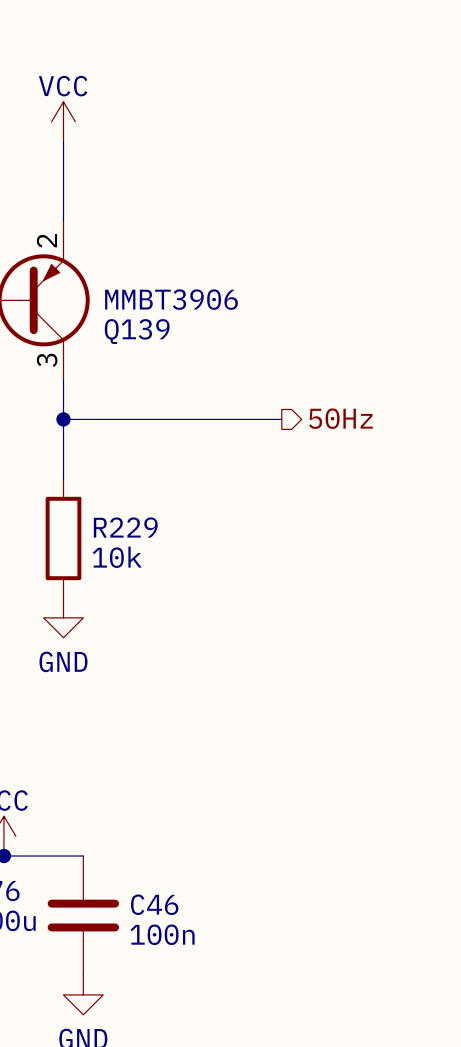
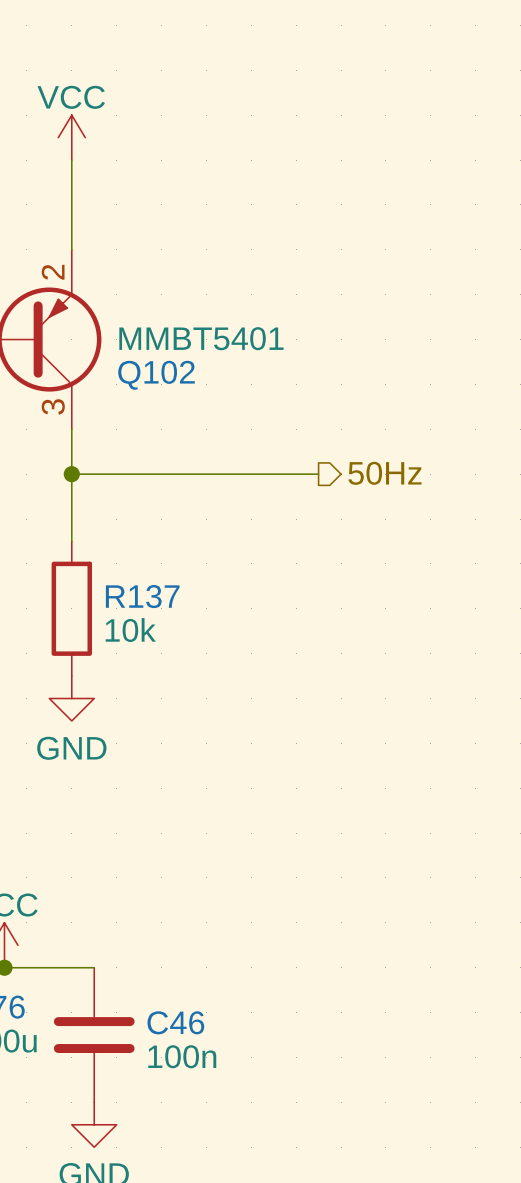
Q139 value: MMBT3906 (171, 299) -> MMBT5401 (201, 338)
Q139 name: Q139 (137, 331) -> Q102 (156, 375)
R229 name: R229 (125, 527) -> R137 (142, 596)

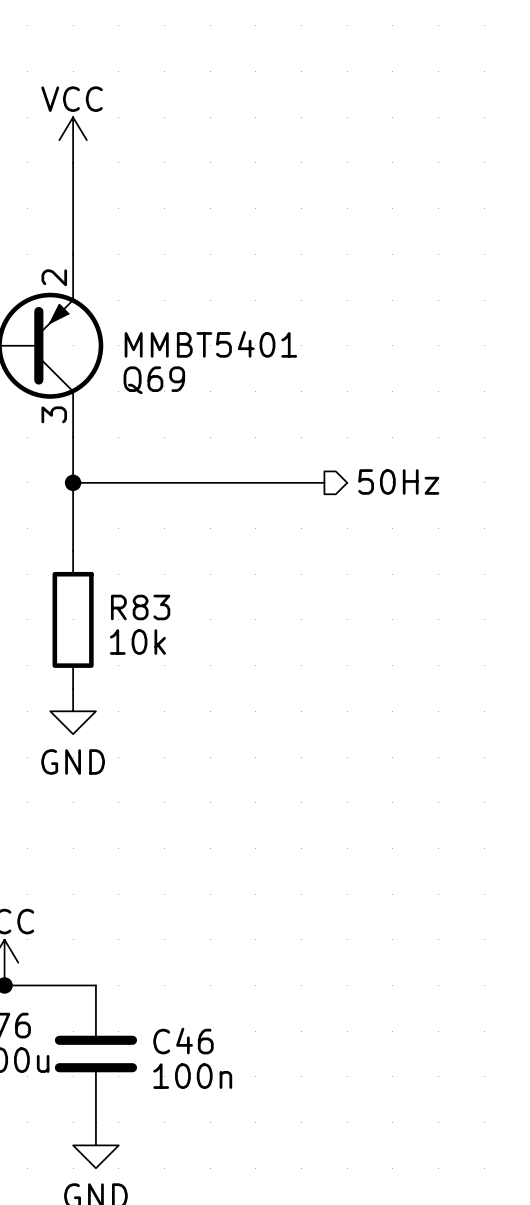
Q102 name: Q102 (156, 375) -> Q69 (154, 380)
R137 name: R137 (142, 596) -> R83 (140, 607)

